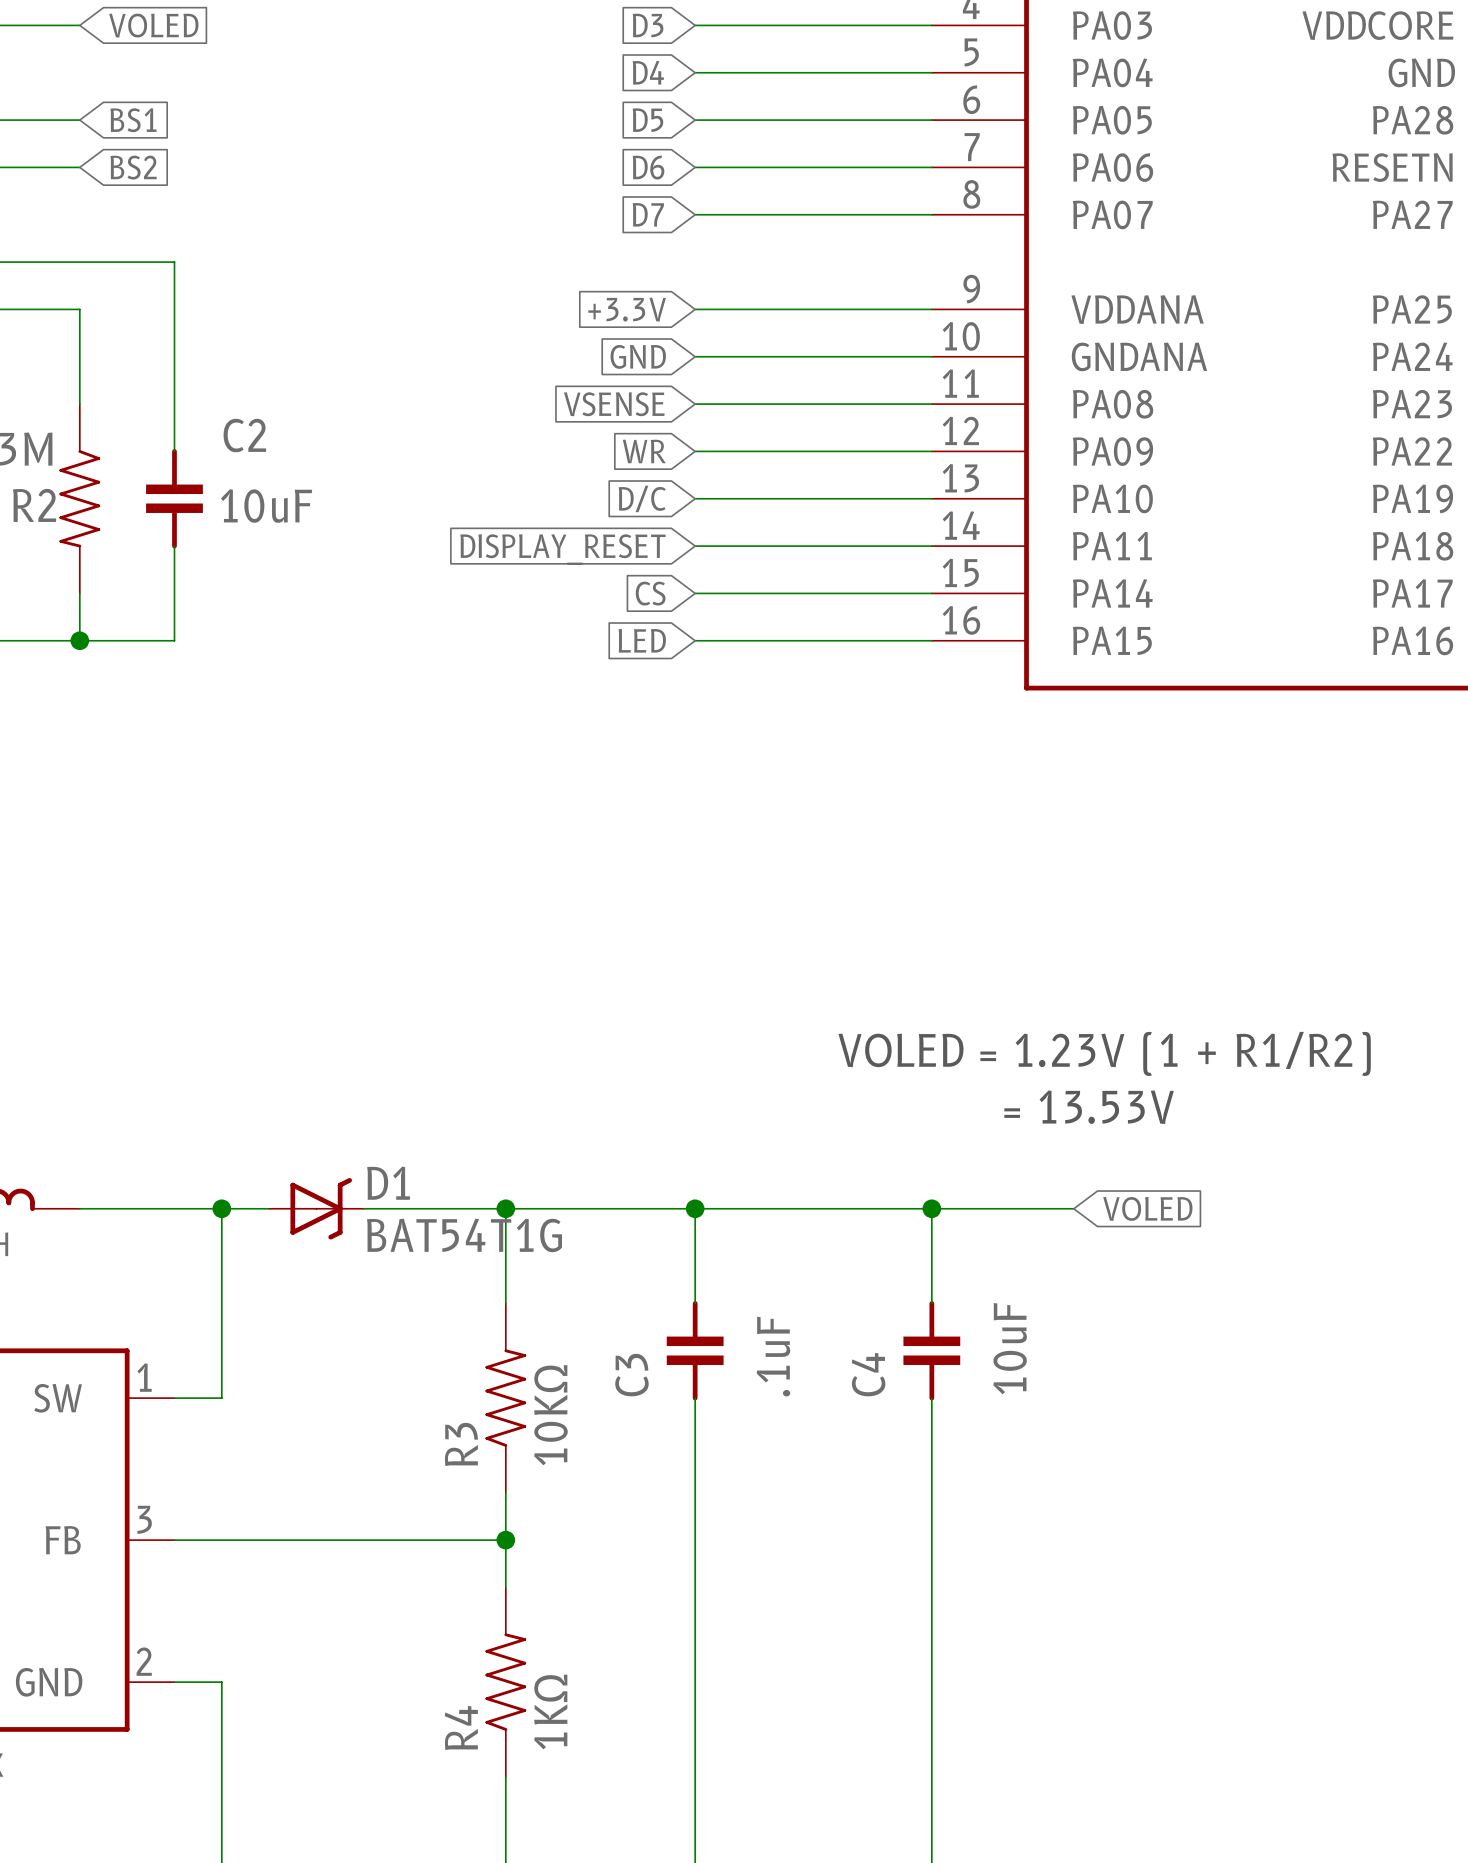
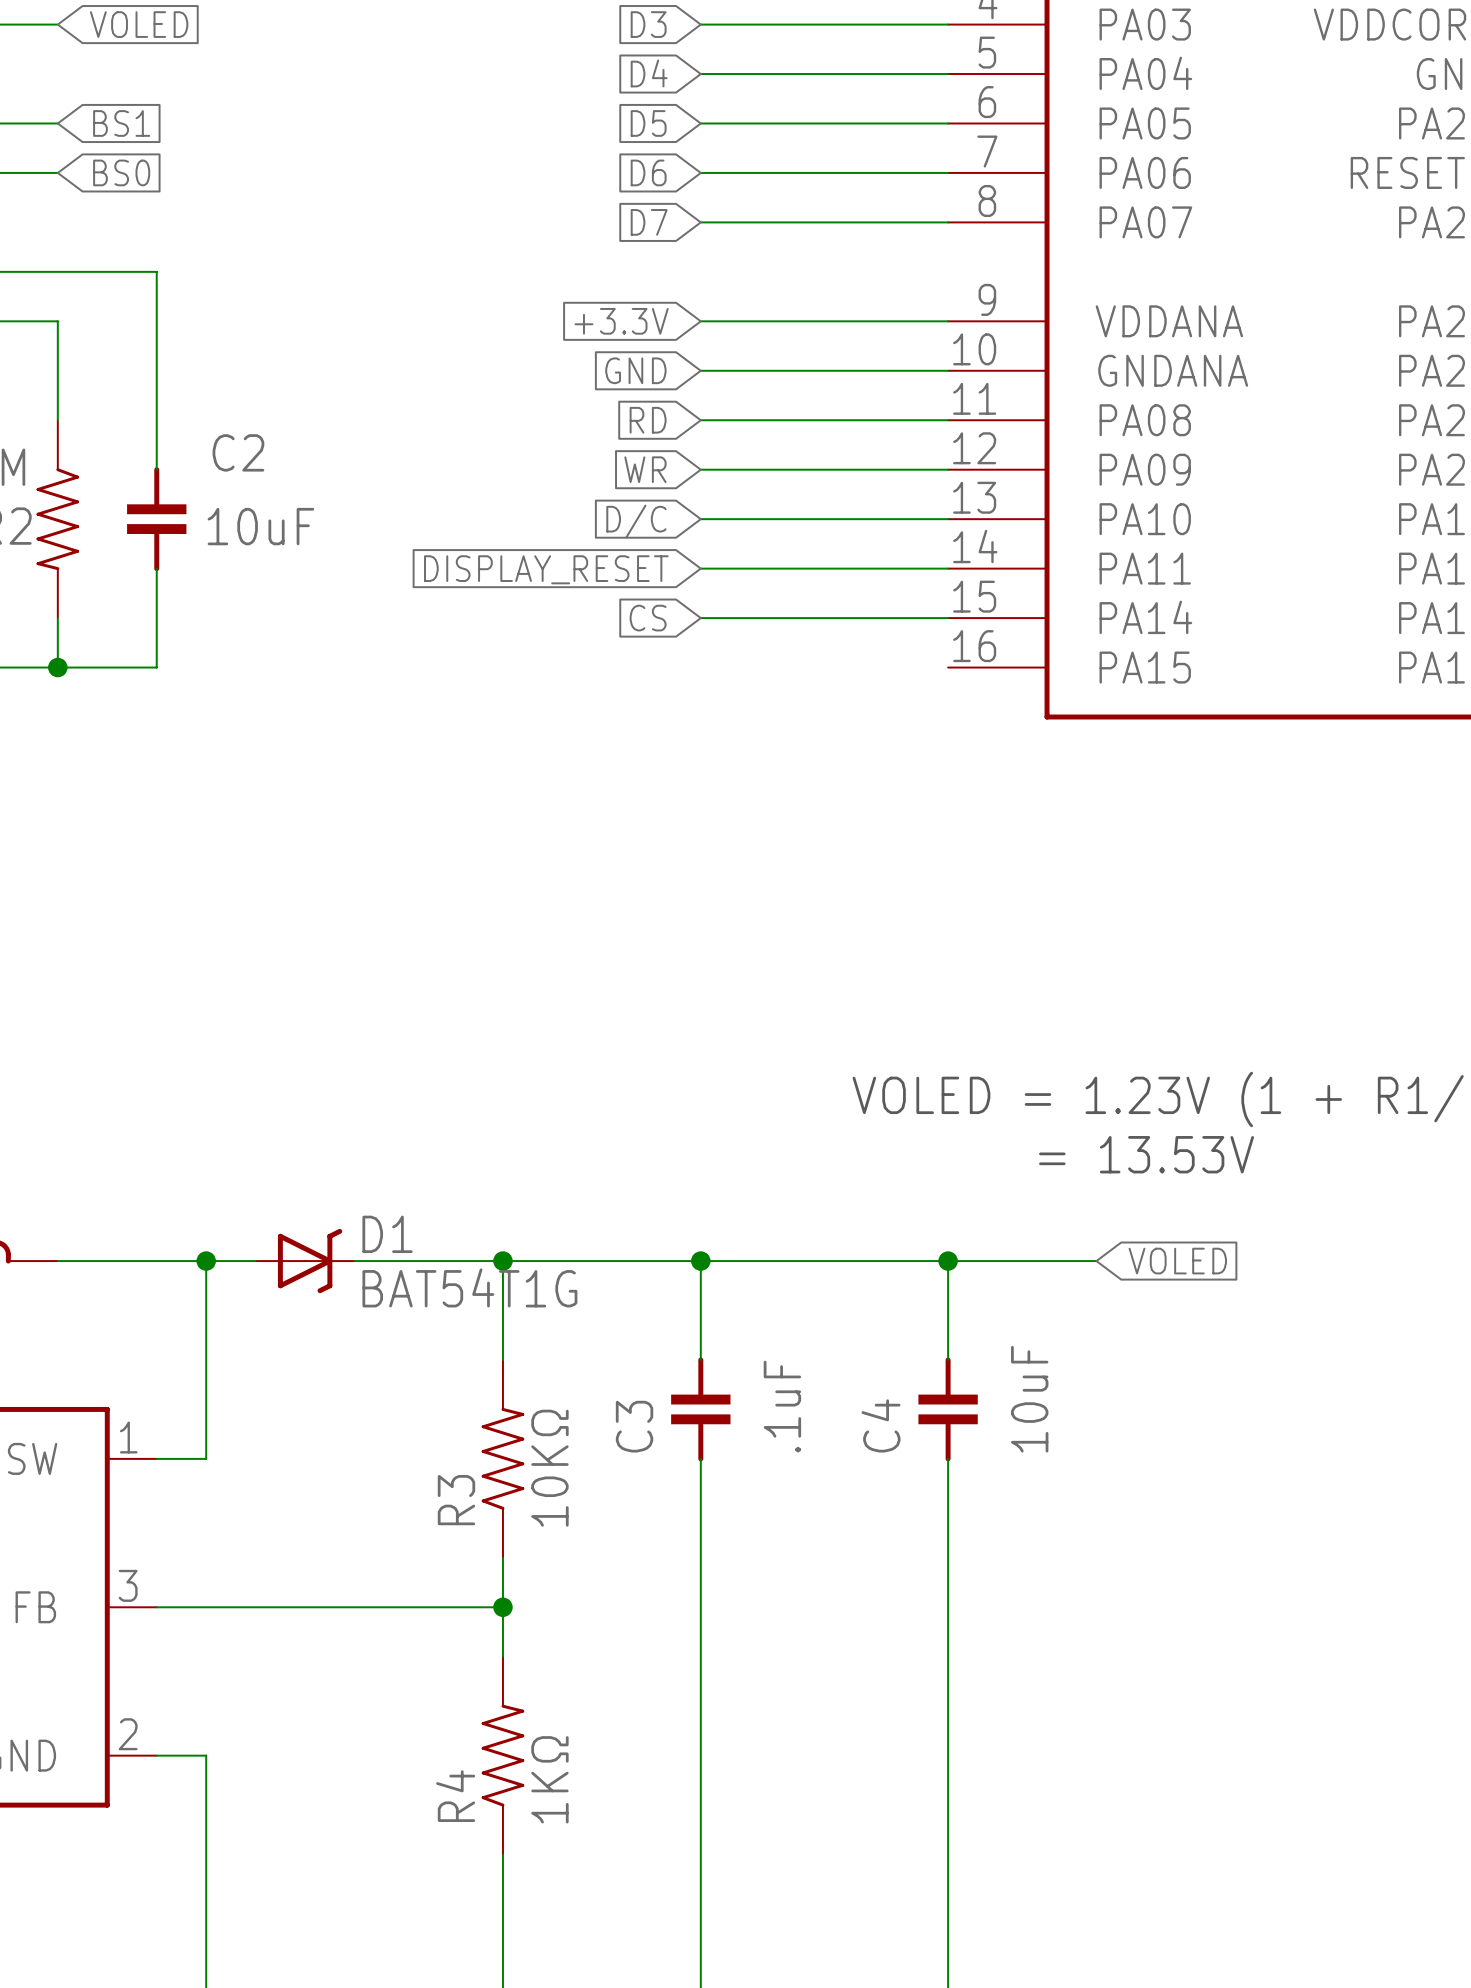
global label: BS2 (133, 167) -> BS0 (121, 172)
global label: VSENSE (614, 404) -> RD (648, 420)
global label: LED (642, 640) -> none
wire: (695, 640) (931, 640) -> none

